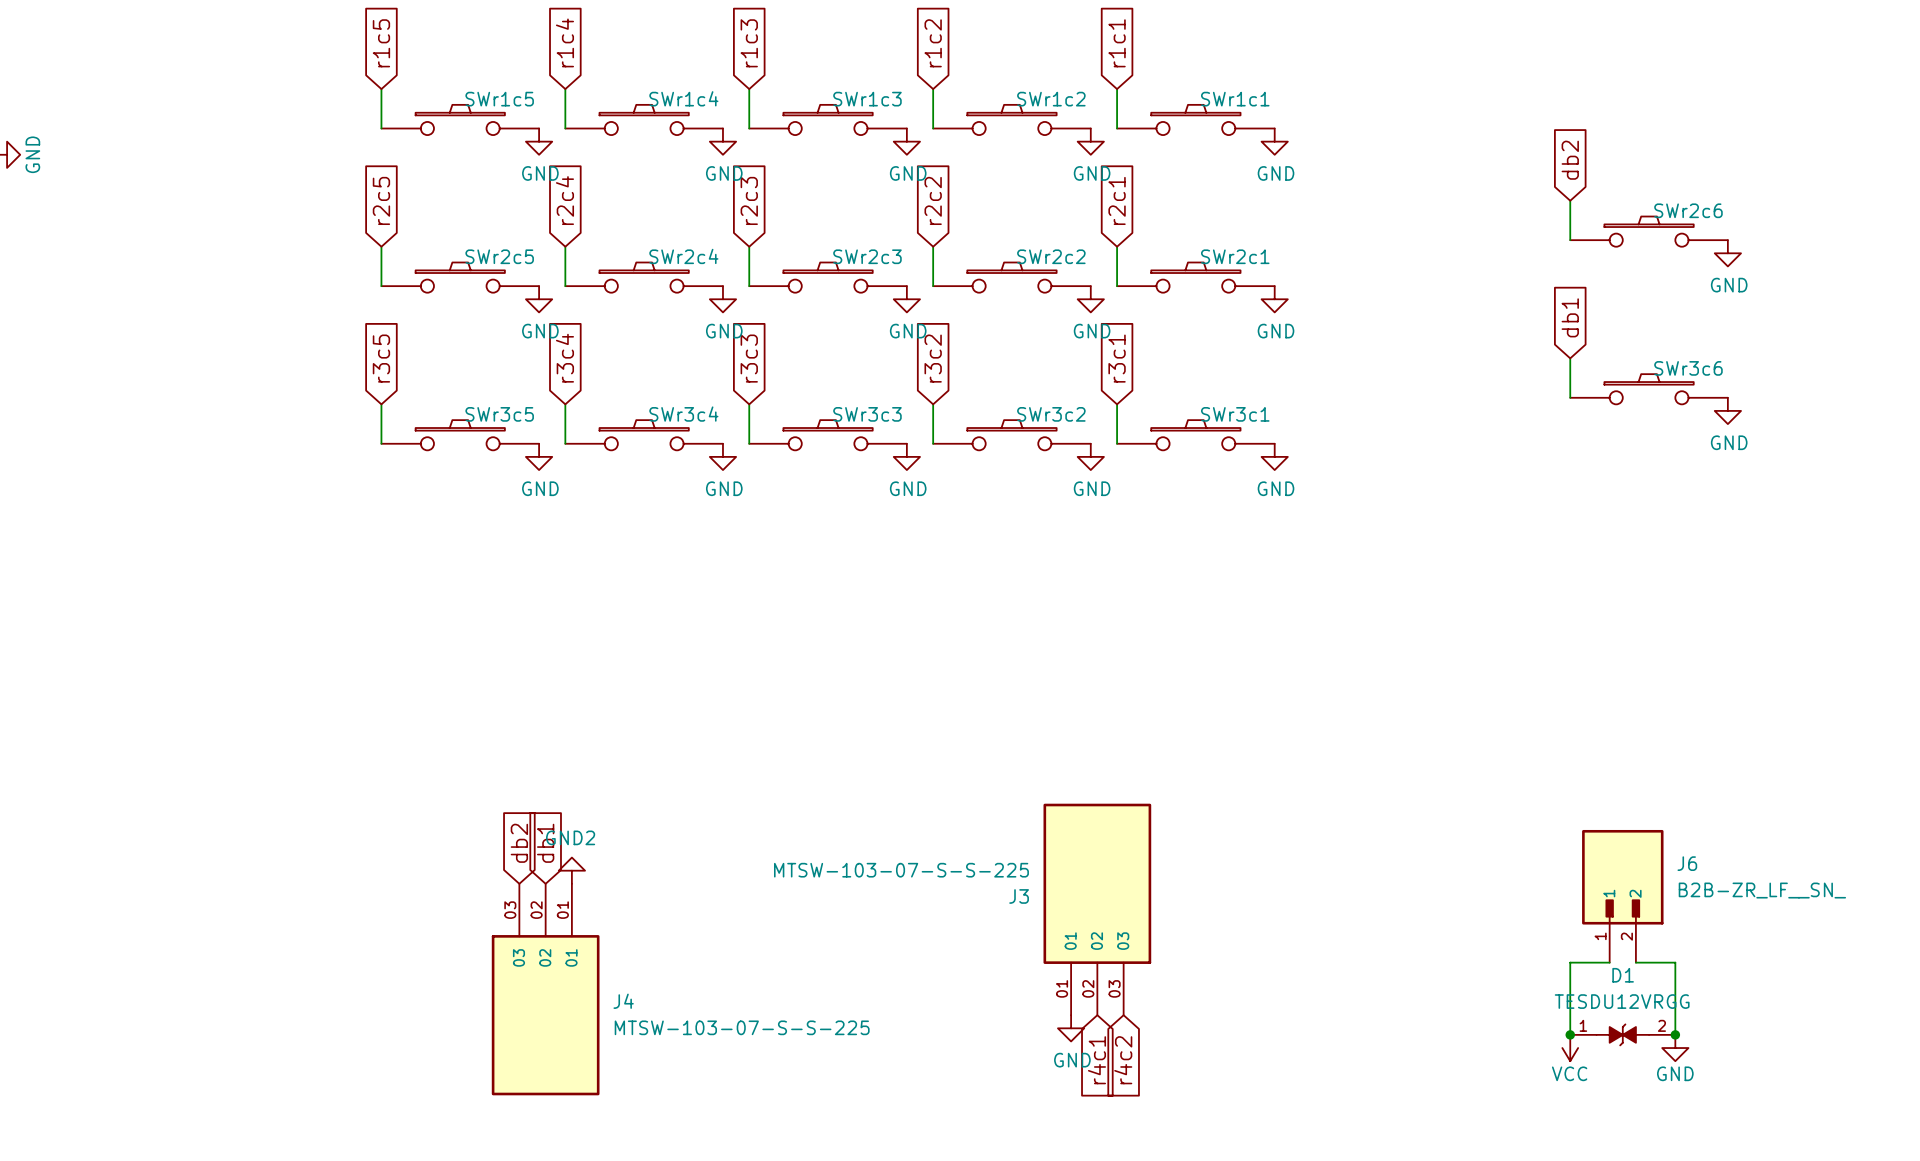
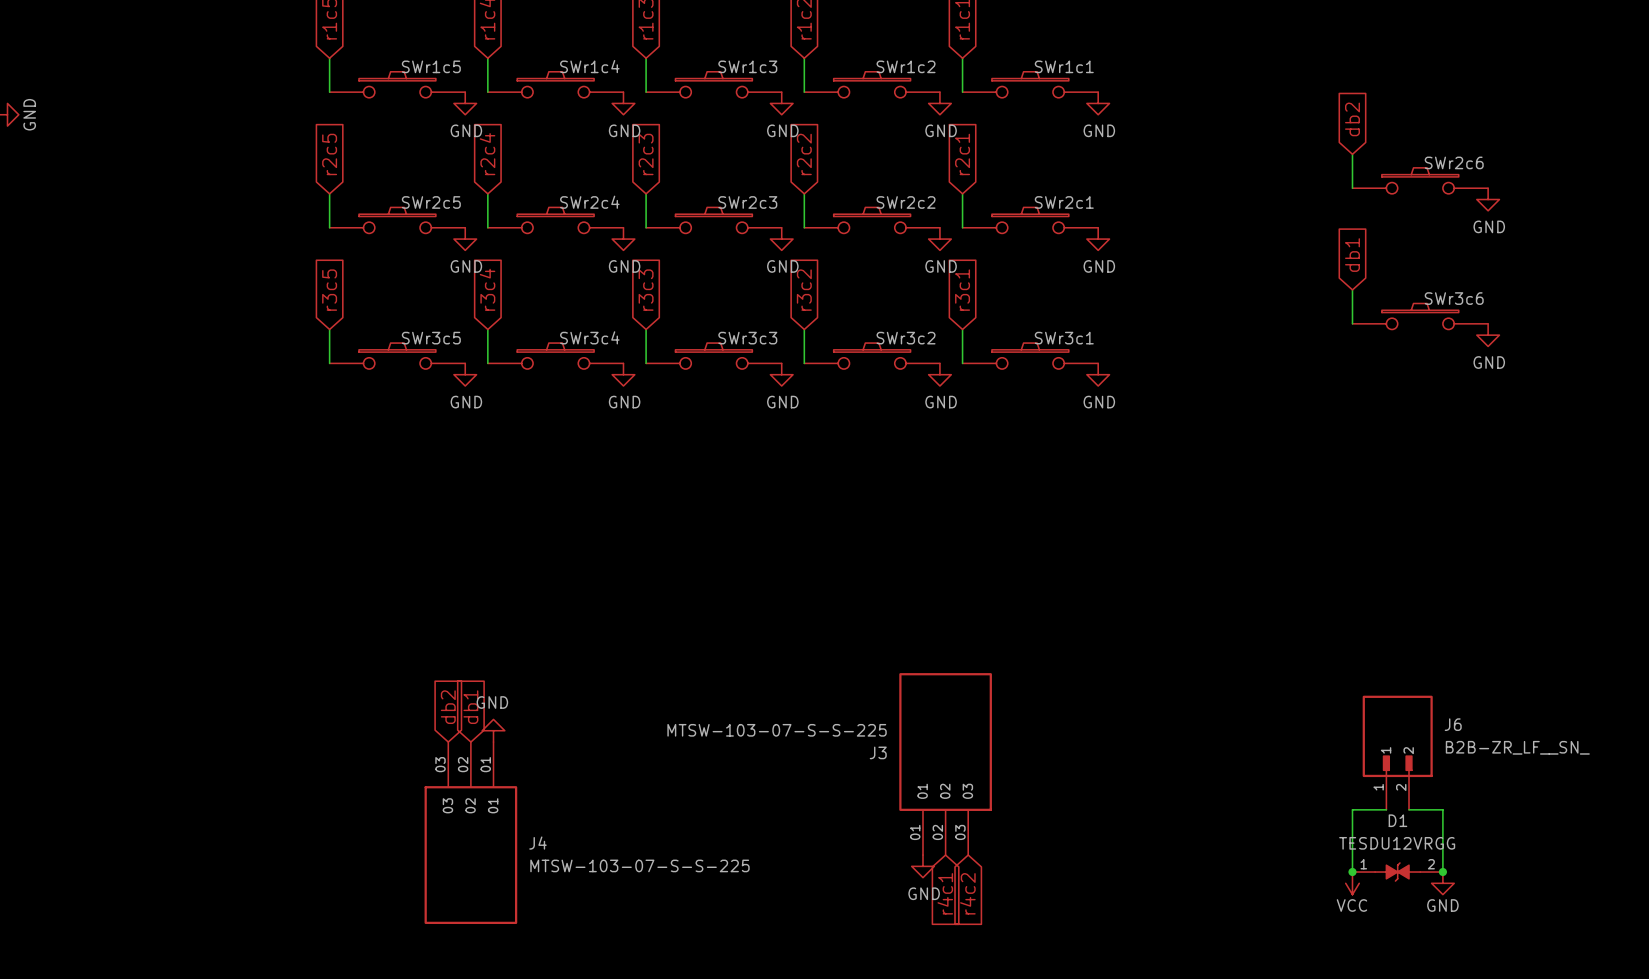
power symbol: GND2 (571, 870) -> GND (493, 730)

